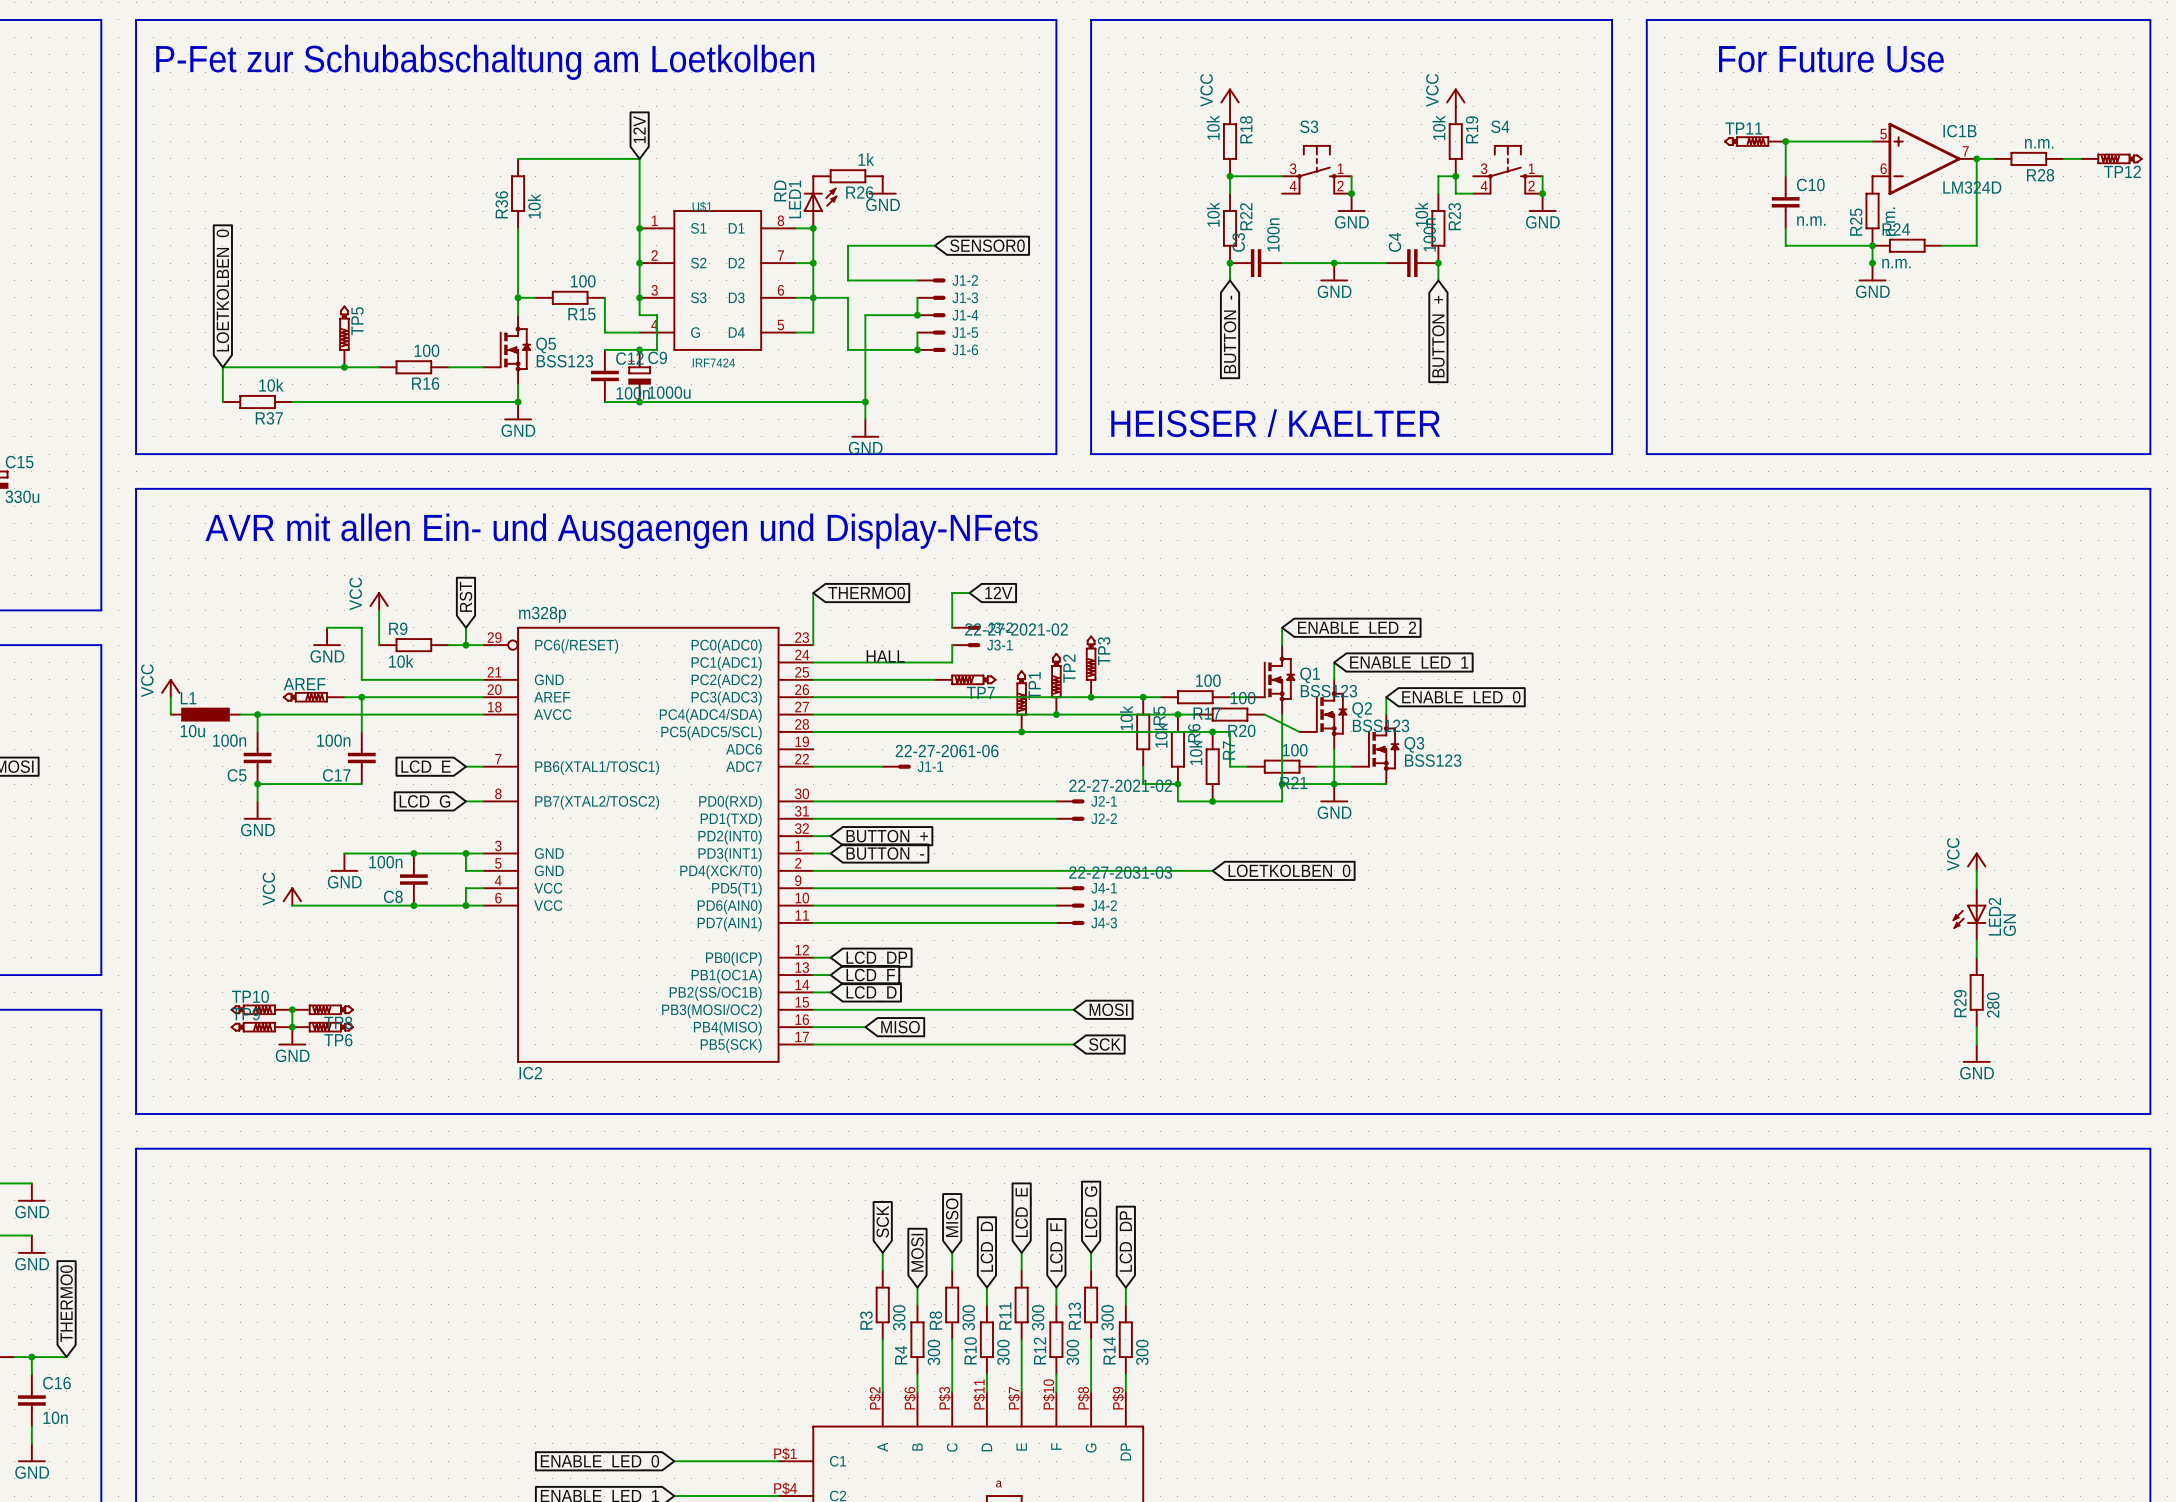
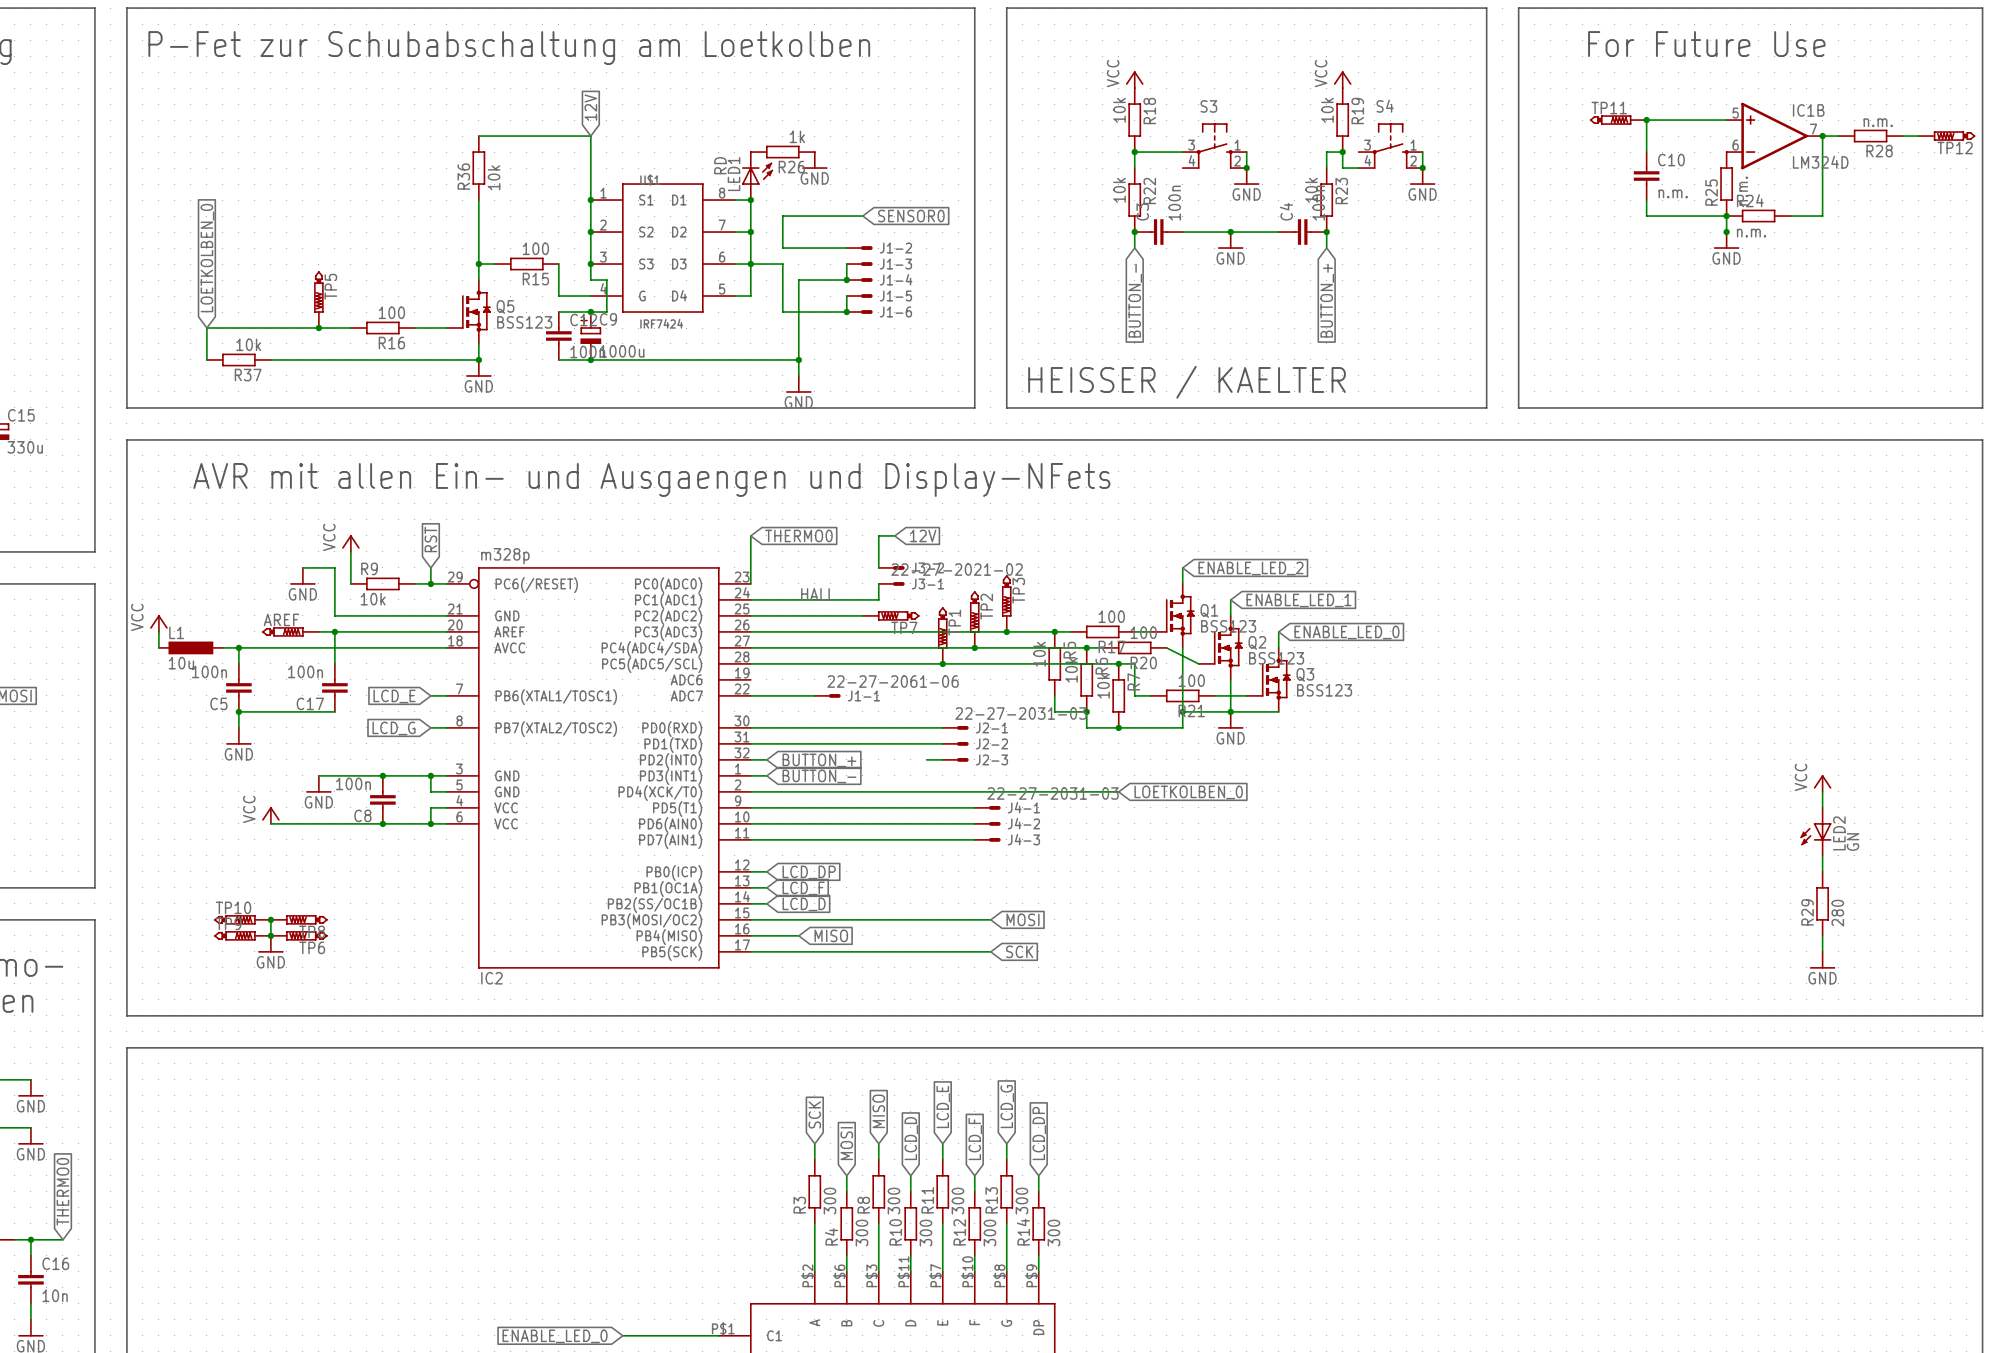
J2-1 value: 22-27-2021-02 (1120, 785) -> 22-27-2031-03 (1021, 713)
J2-1 position: (1070, 801) -> (955, 727)
J2-2 position: (1070, 818) -> (955, 743)
wire: none -> (926, 759) (942, 759)
J2-3: none -> (955, 759)

